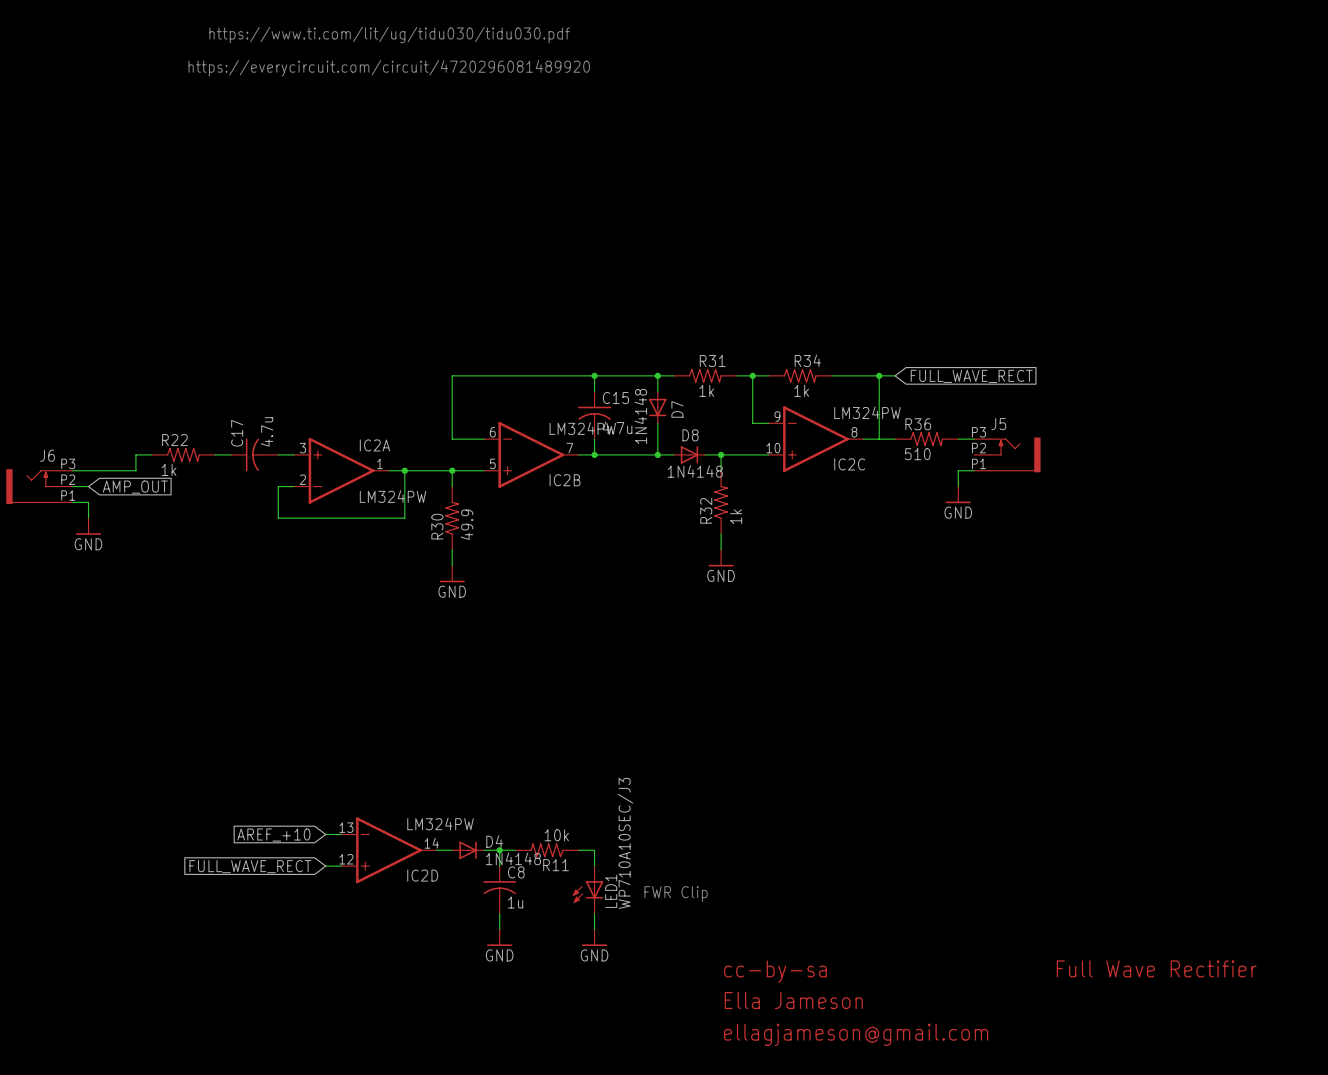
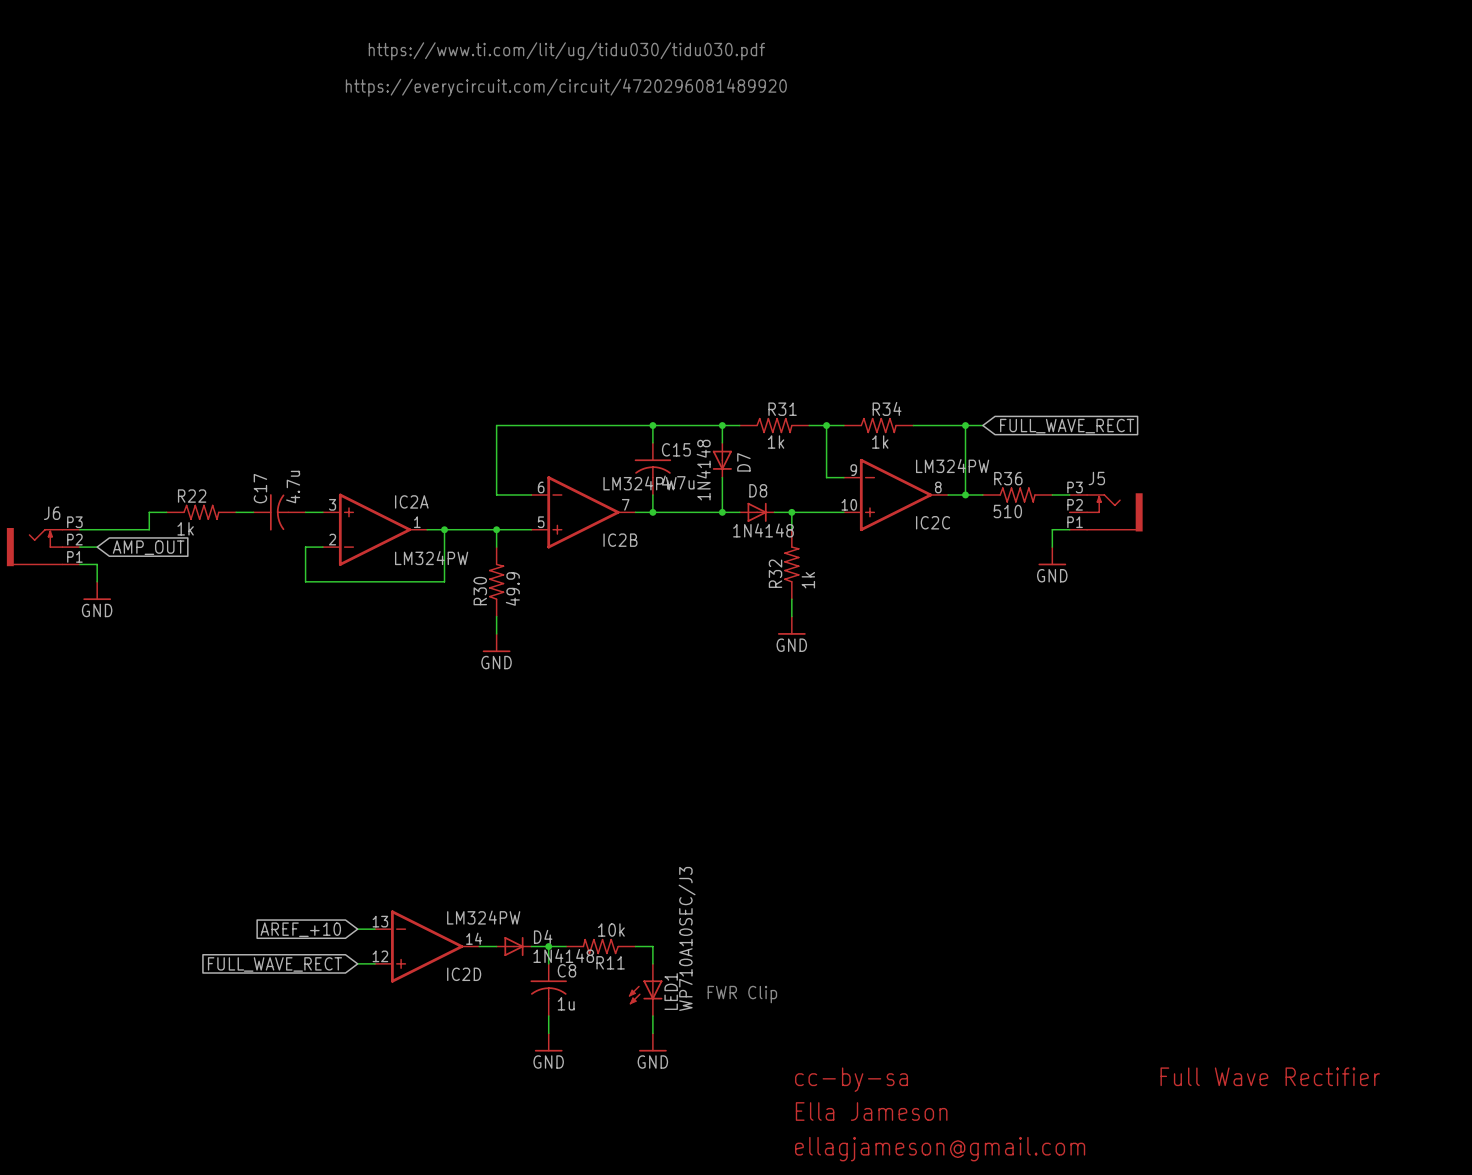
text position: https://www.ti.com/lit/ug/tidu030/tidu030.pdf (389, 35) -> https://www.ti.com/lit/ug/tidu030/tidu030.pdf (566, 51)
text position: https://everycircuit.com/circuit/4720296081489920 (389, 68) -> https://everycircuit.com/circuit/4720296081489920 (566, 87)
junction: none -> (965, 494)

